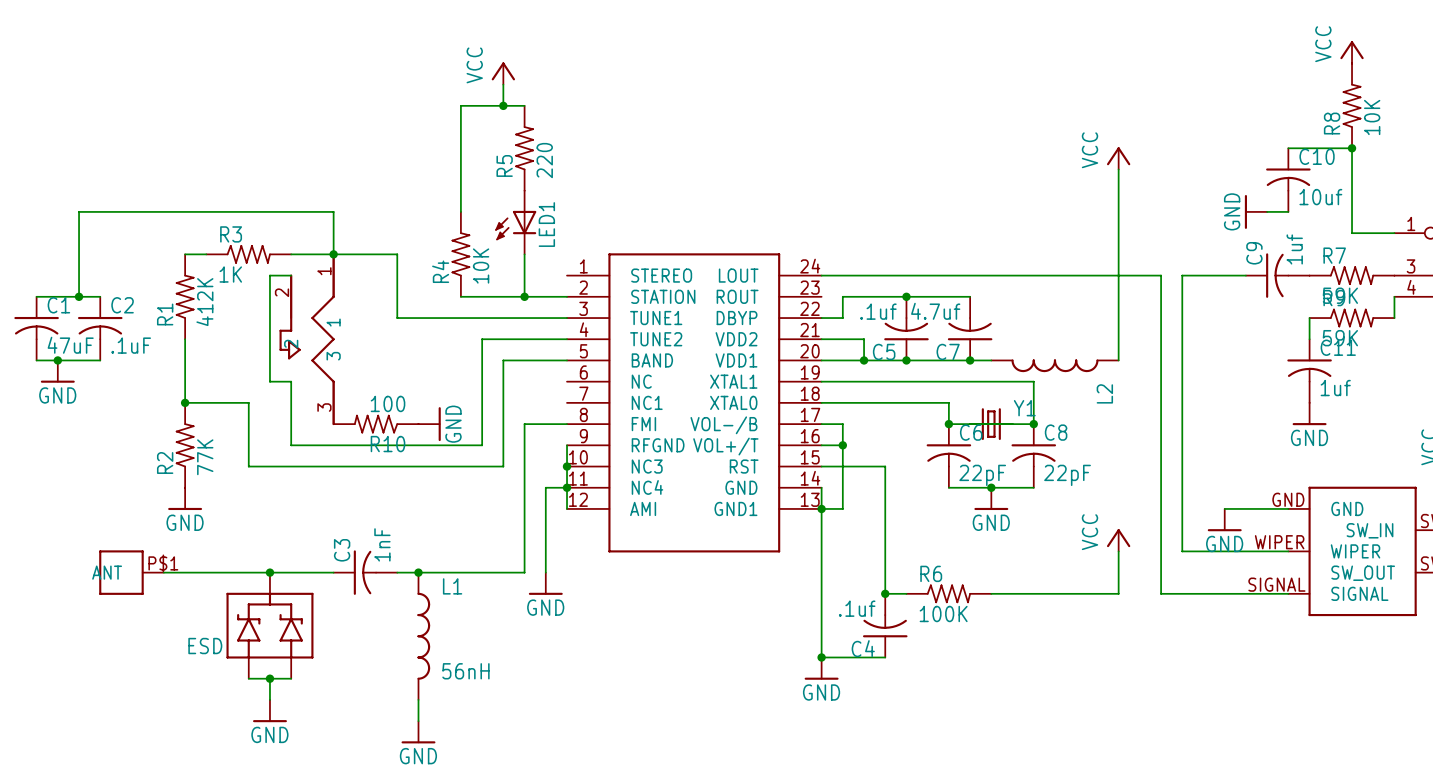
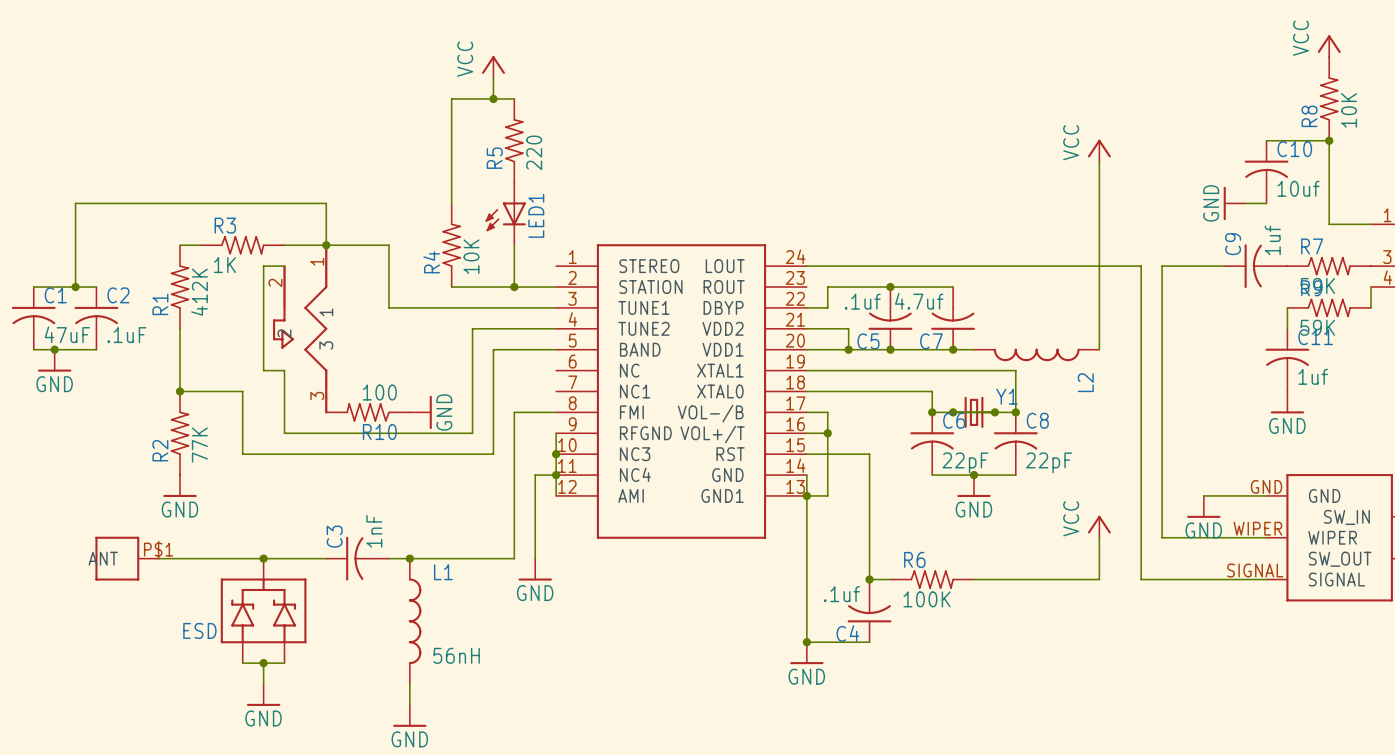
junction: none -> (953, 412)
junction: none -> (994, 412)

